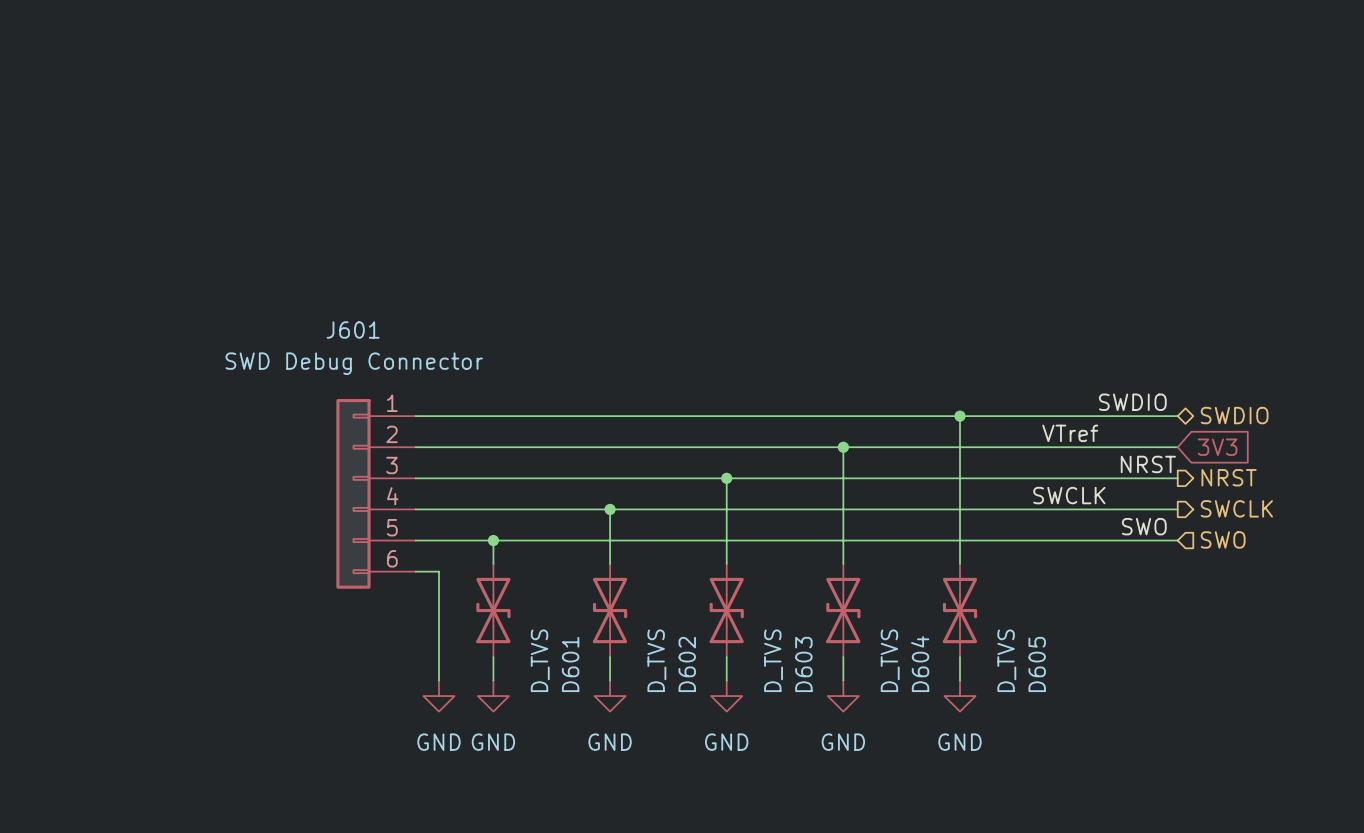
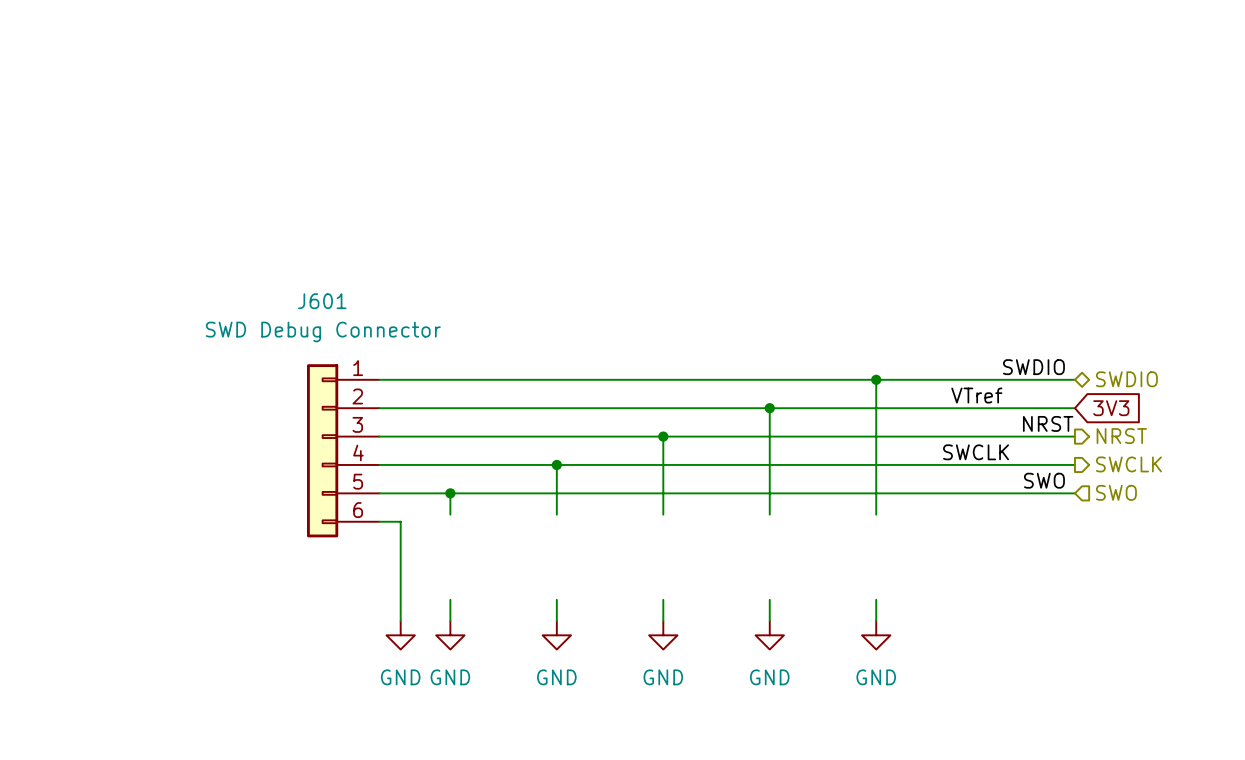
D601: D_TVS (493, 610) -> none
D602: D_TVS (610, 610) -> none
D603: D_TVS (726, 610) -> none
D604: D_TVS (843, 610) -> none
D605: D_TVS (960, 610) -> none

